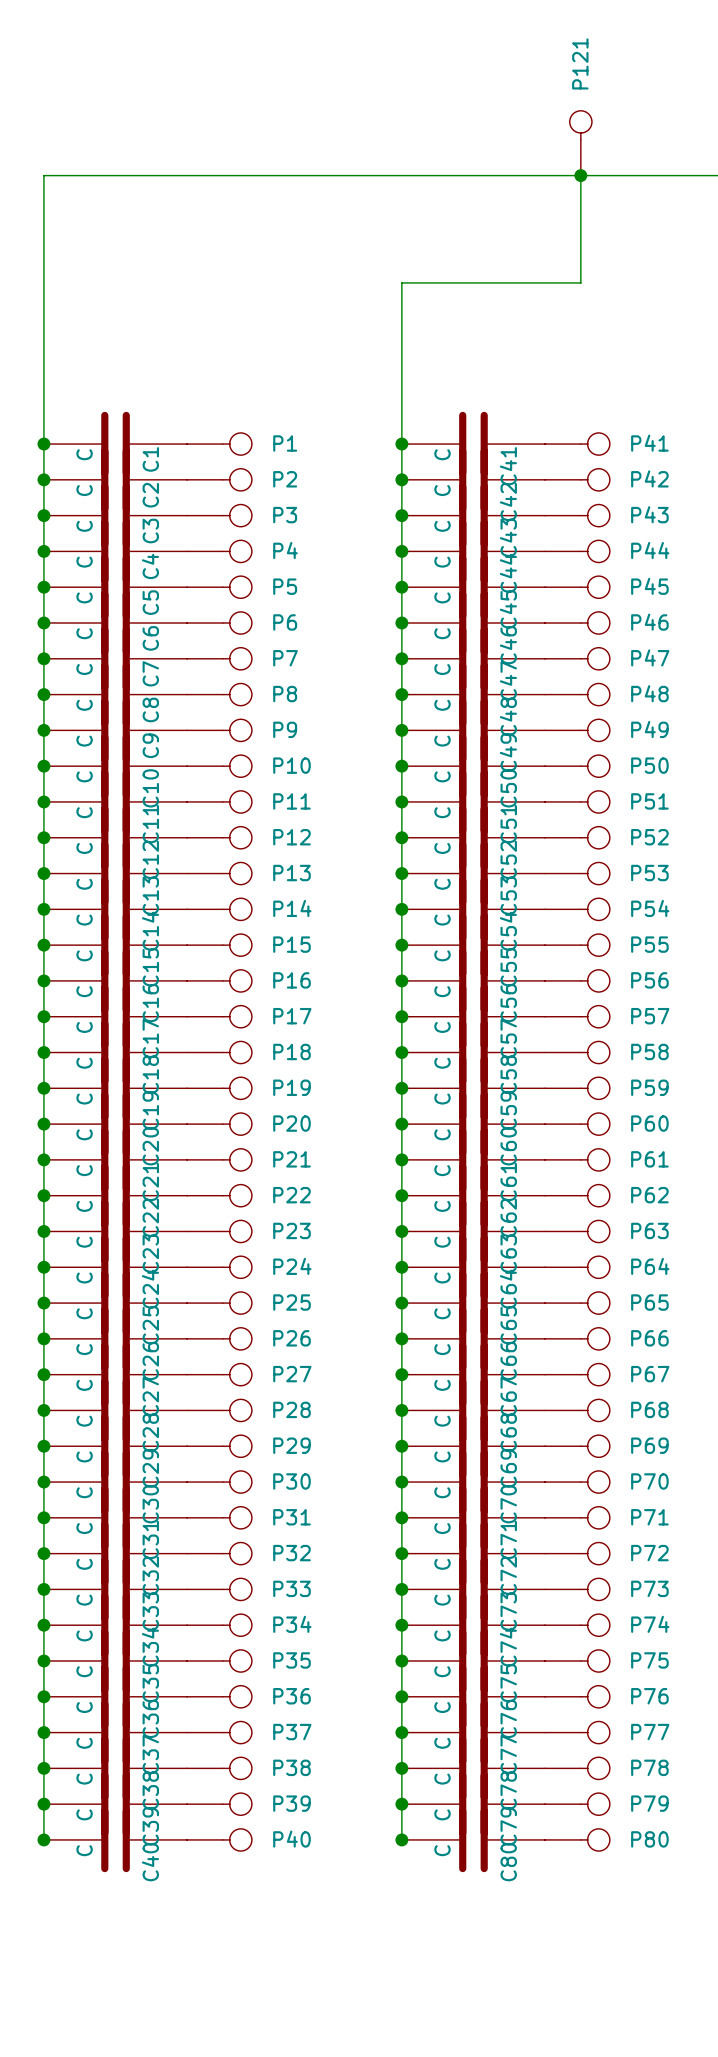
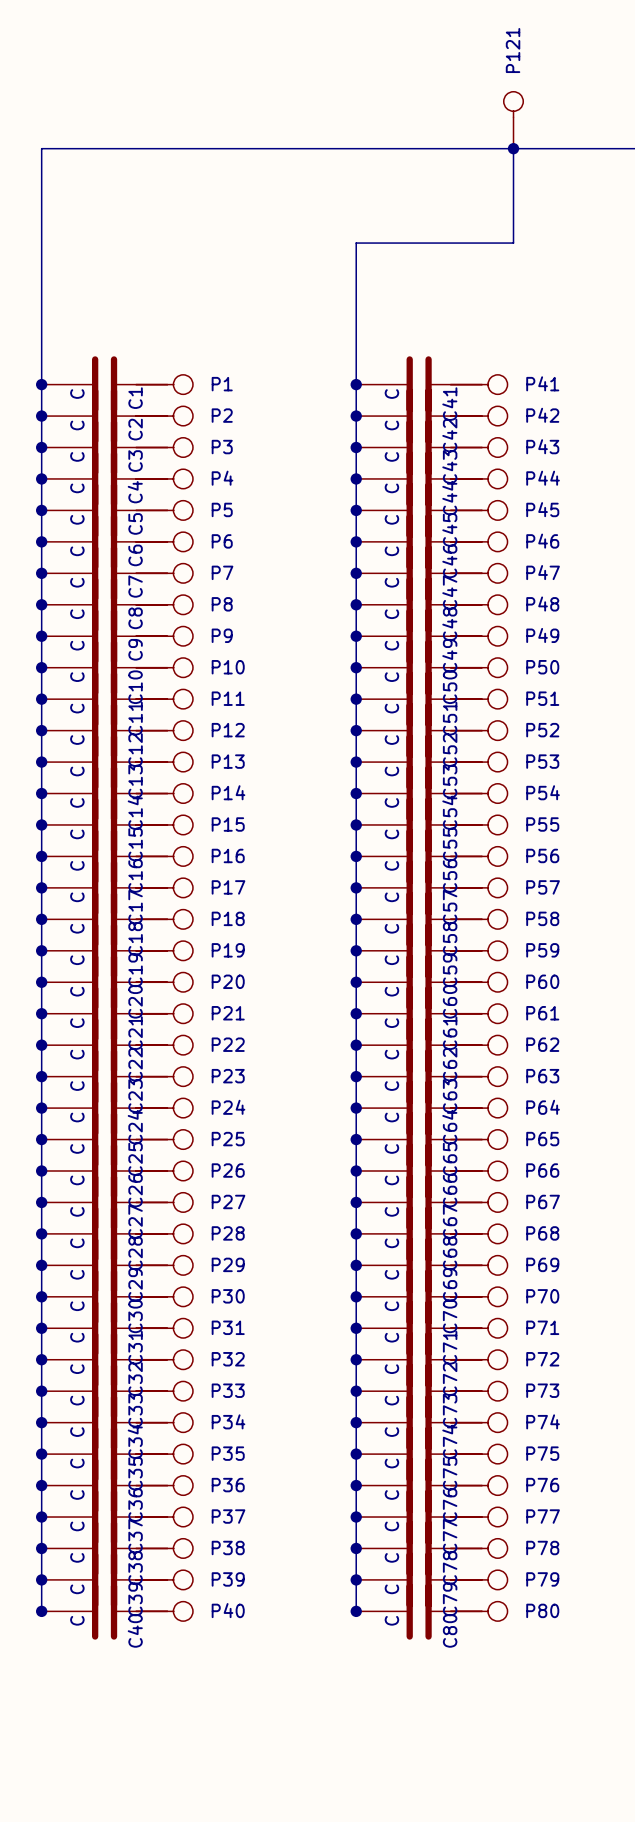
P1 position: (219, 444) -> (164, 384)
P41 position: (577, 444) -> (479, 384)
P2 position: (219, 479) -> (164, 416)
P42 position: (577, 479) -> (479, 416)
P3 position: (219, 515) -> (164, 447)
P43 position: (577, 515) -> (479, 447)
P4 position: (219, 551) -> (164, 478)
P44 position: (577, 551) -> (479, 478)
P5 position: (219, 587) -> (164, 510)
P45 position: (577, 587) -> (479, 510)
P6 position: (219, 623) -> (164, 541)
P46 position: (577, 623) -> (479, 541)
P7 position: (219, 658) -> (164, 573)
P47 position: (577, 658) -> (479, 573)
P8 position: (219, 694) -> (164, 604)
P48 position: (577, 694) -> (479, 604)
P9 position: (219, 730) -> (164, 636)
P49 position: (577, 730) -> (479, 636)
P10 position: (219, 766) -> (164, 667)
P50 position: (577, 766) -> (479, 667)
P11 position: (219, 801) -> (164, 699)
P51 position: (577, 801) -> (479, 699)
P12 position: (219, 837) -> (164, 730)
P52 position: (577, 837) -> (479, 730)
P13 position: (219, 873) -> (164, 762)
P53 position: (577, 873) -> (479, 762)
P14 position: (219, 909) -> (164, 793)
P54 position: (577, 909) -> (479, 793)
P15 position: (219, 945) -> (164, 824)
P55 position: (577, 945) -> (479, 824)
P16 position: (219, 980) -> (164, 856)
P56 position: (577, 980) -> (479, 856)
P17 position: (219, 1016) -> (164, 887)
P57 position: (577, 1016) -> (479, 887)
P18 position: (219, 1052) -> (164, 919)
P58 position: (577, 1052) -> (479, 919)
P19 position: (219, 1088) -> (164, 950)
P59 position: (577, 1088) -> (479, 950)
P20 position: (219, 1124) -> (164, 982)
P60 position: (577, 1124) -> (479, 982)
P21 position: (219, 1159) -> (164, 1013)
P61 position: (577, 1159) -> (479, 1013)
P22 position: (219, 1195) -> (164, 1045)
P62 position: (577, 1195) -> (479, 1045)
P23 position: (219, 1231) -> (164, 1076)
P63 position: (577, 1231) -> (479, 1076)
P24 position: (219, 1267) -> (164, 1108)
P64 position: (577, 1267) -> (479, 1108)
P25 position: (219, 1303) -> (164, 1139)
P65 position: (577, 1303) -> (479, 1139)
P26 position: (219, 1338) -> (164, 1170)
P66 position: (577, 1338) -> (479, 1170)
P27 position: (219, 1374) -> (164, 1202)
P67 position: (577, 1374) -> (479, 1202)
P28 position: (219, 1410) -> (164, 1233)
P68 position: (577, 1410) -> (479, 1233)
P29 position: (219, 1446) -> (164, 1265)
P69 position: (577, 1446) -> (479, 1265)
P30 position: (219, 1482) -> (164, 1296)
P70 position: (577, 1482) -> (479, 1296)
P31 position: (219, 1517) -> (164, 1328)
P71 position: (577, 1517) -> (479, 1328)
P32 position: (219, 1553) -> (164, 1359)
P72 position: (577, 1553) -> (479, 1359)
P33 position: (219, 1589) -> (164, 1391)
P73 position: (577, 1589) -> (479, 1391)
P34 position: (219, 1625) -> (164, 1422)
P74 position: (577, 1625) -> (479, 1422)
P35 position: (219, 1660) -> (164, 1454)
P75 position: (577, 1660) -> (479, 1454)
P36 position: (219, 1696) -> (164, 1485)
P76 position: (577, 1696) -> (479, 1485)
P37 position: (219, 1732) -> (164, 1517)
P77 position: (577, 1732) -> (479, 1517)
P38 position: (219, 1768) -> (164, 1548)
P78 position: (577, 1768) -> (479, 1548)
P39 position: (219, 1804) -> (164, 1579)
P79 position: (577, 1804) -> (479, 1579)
P40 position: (219, 1839) -> (164, 1611)
P80 position: (577, 1839) -> (479, 1611)

